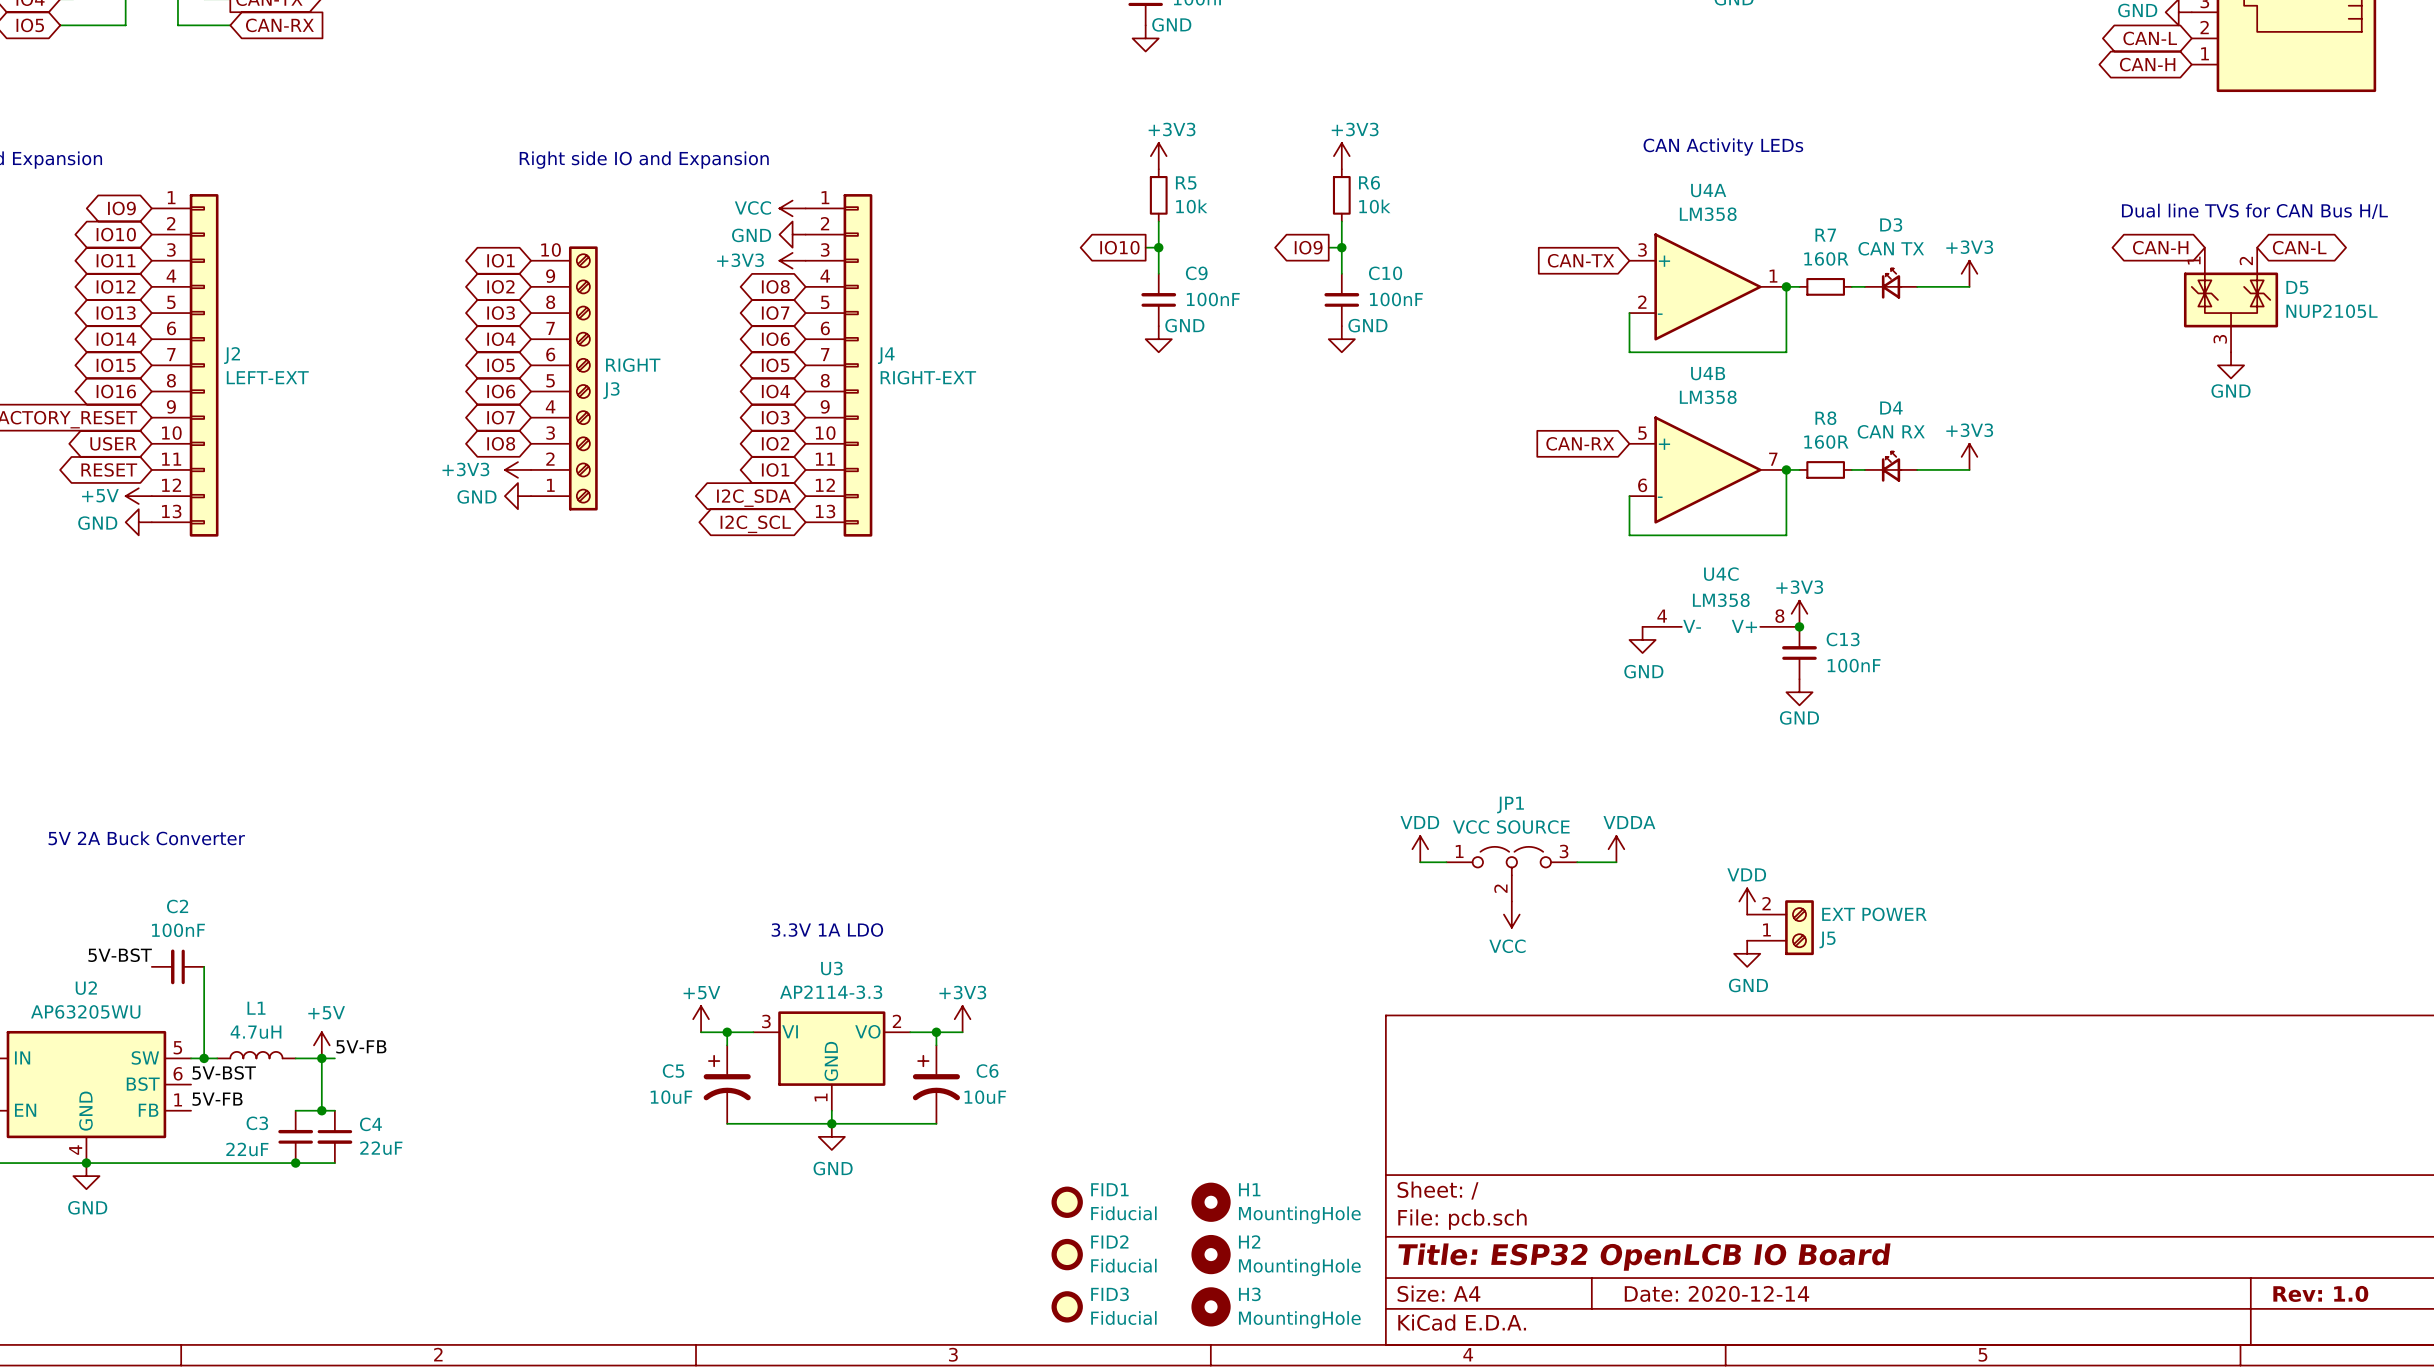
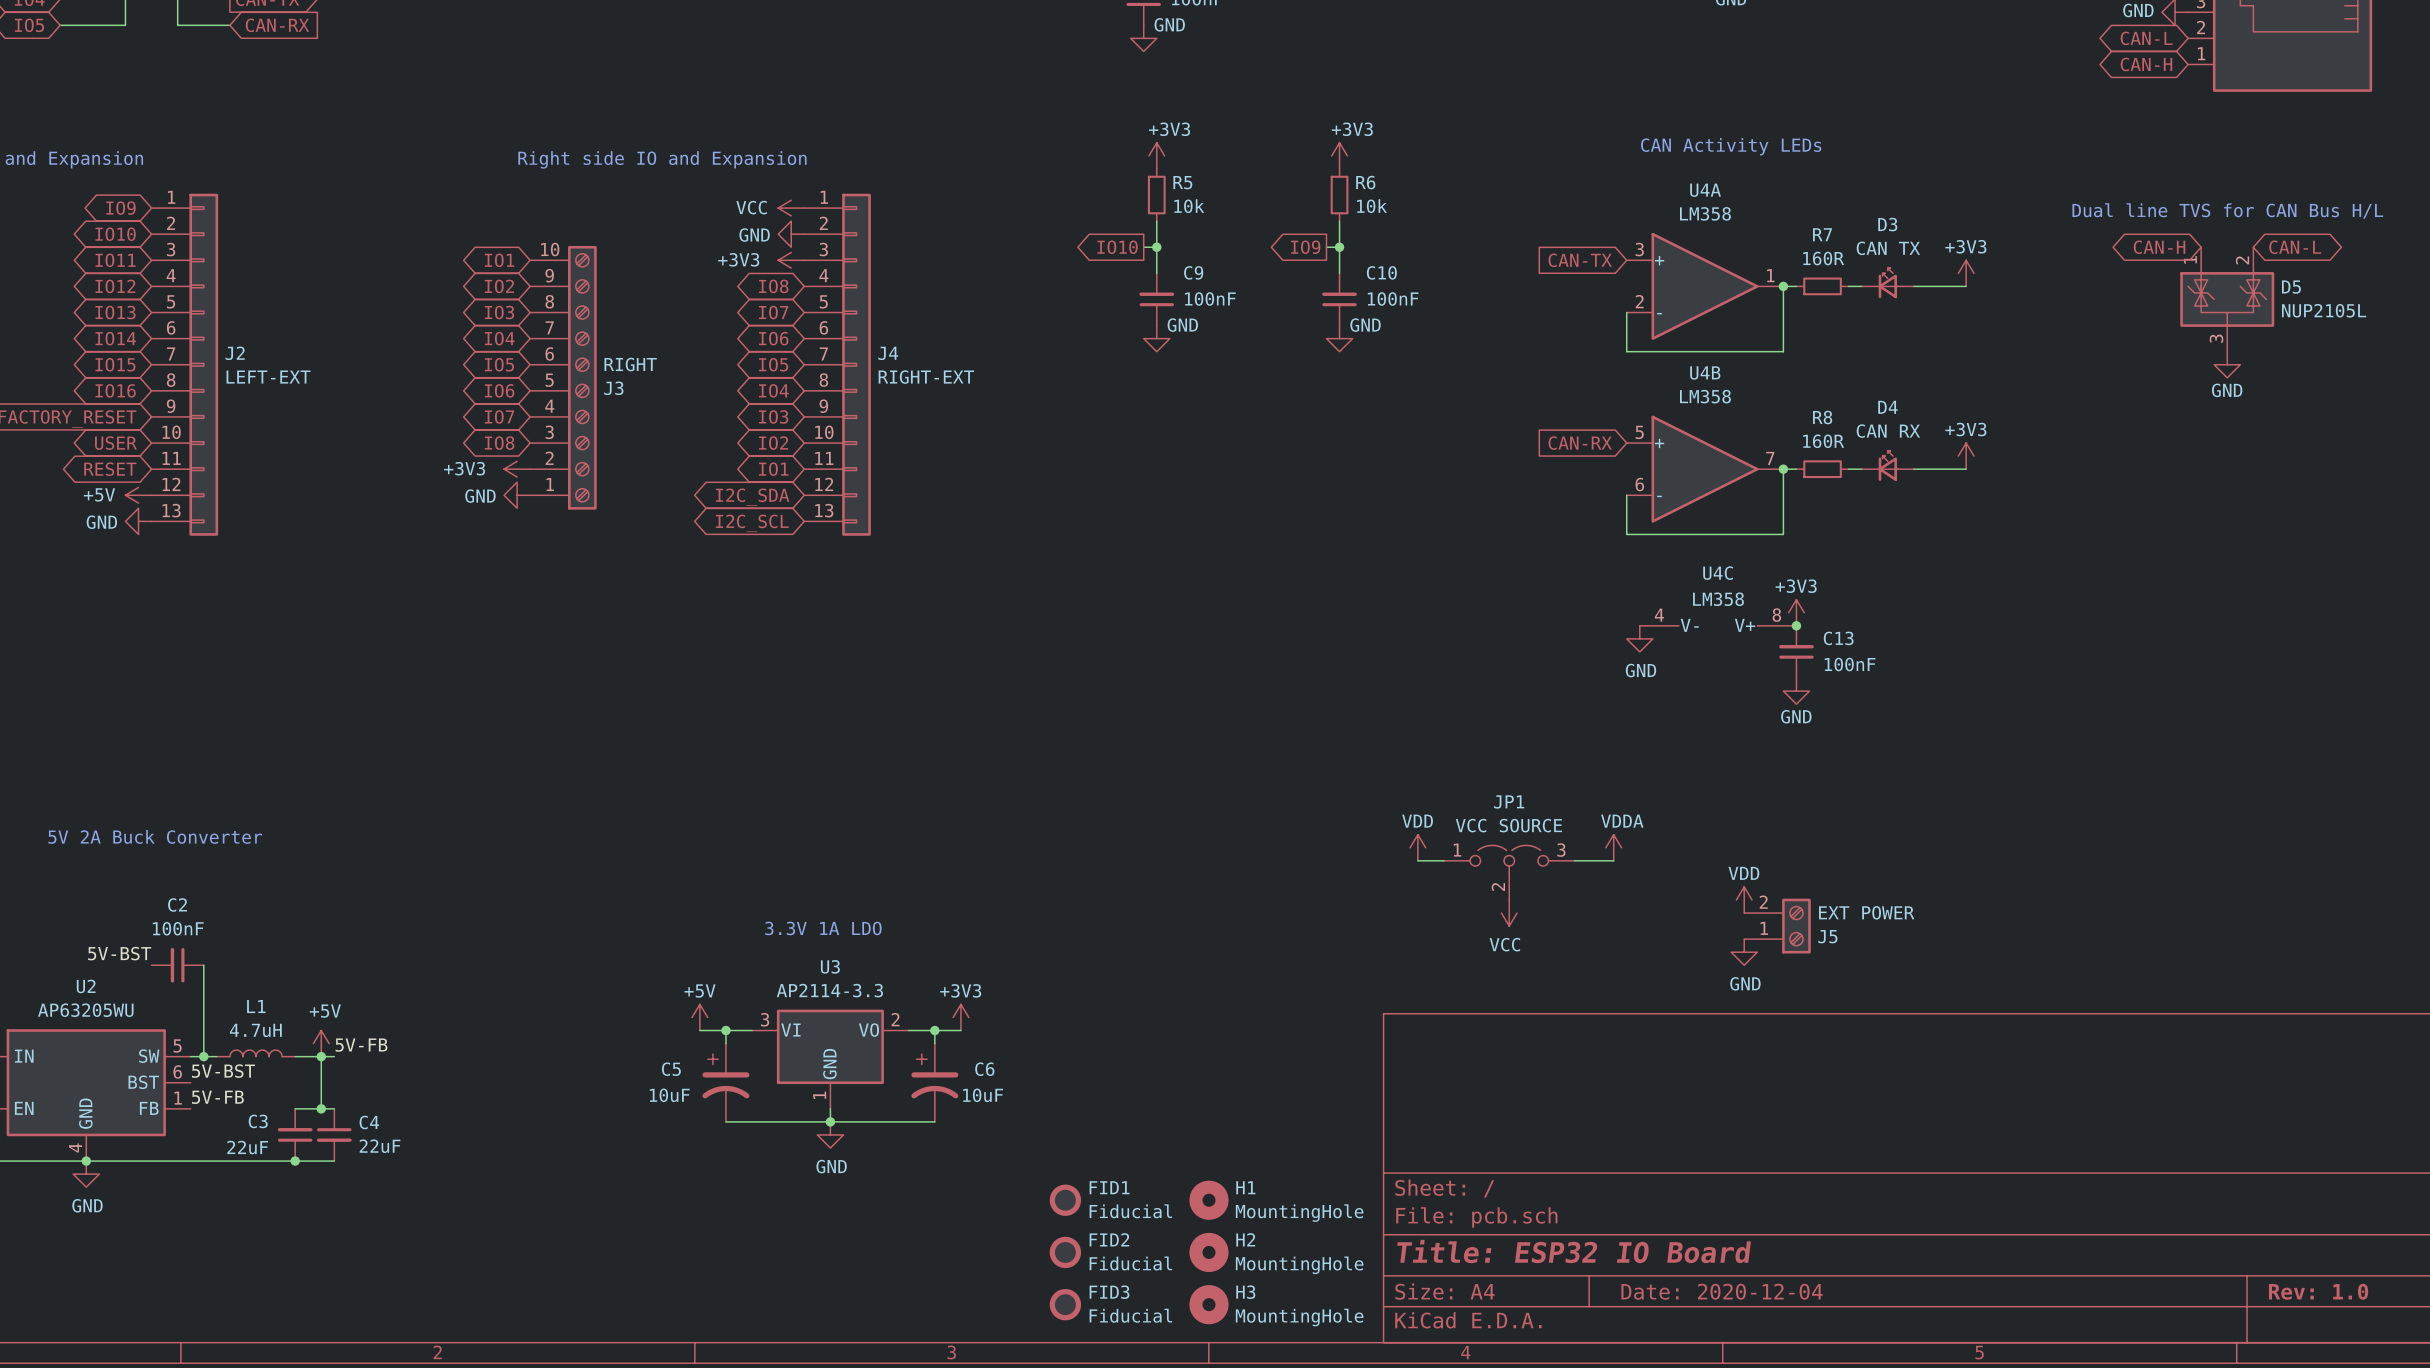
title block: Title: ESP32 OpenLCB IO Board (1644, 1257) -> Title: ESP32 IO Board (1574, 1251)
title block: Date: 2020-12-14 (1716, 1293) -> Date: 2020-12-04 (1722, 1291)

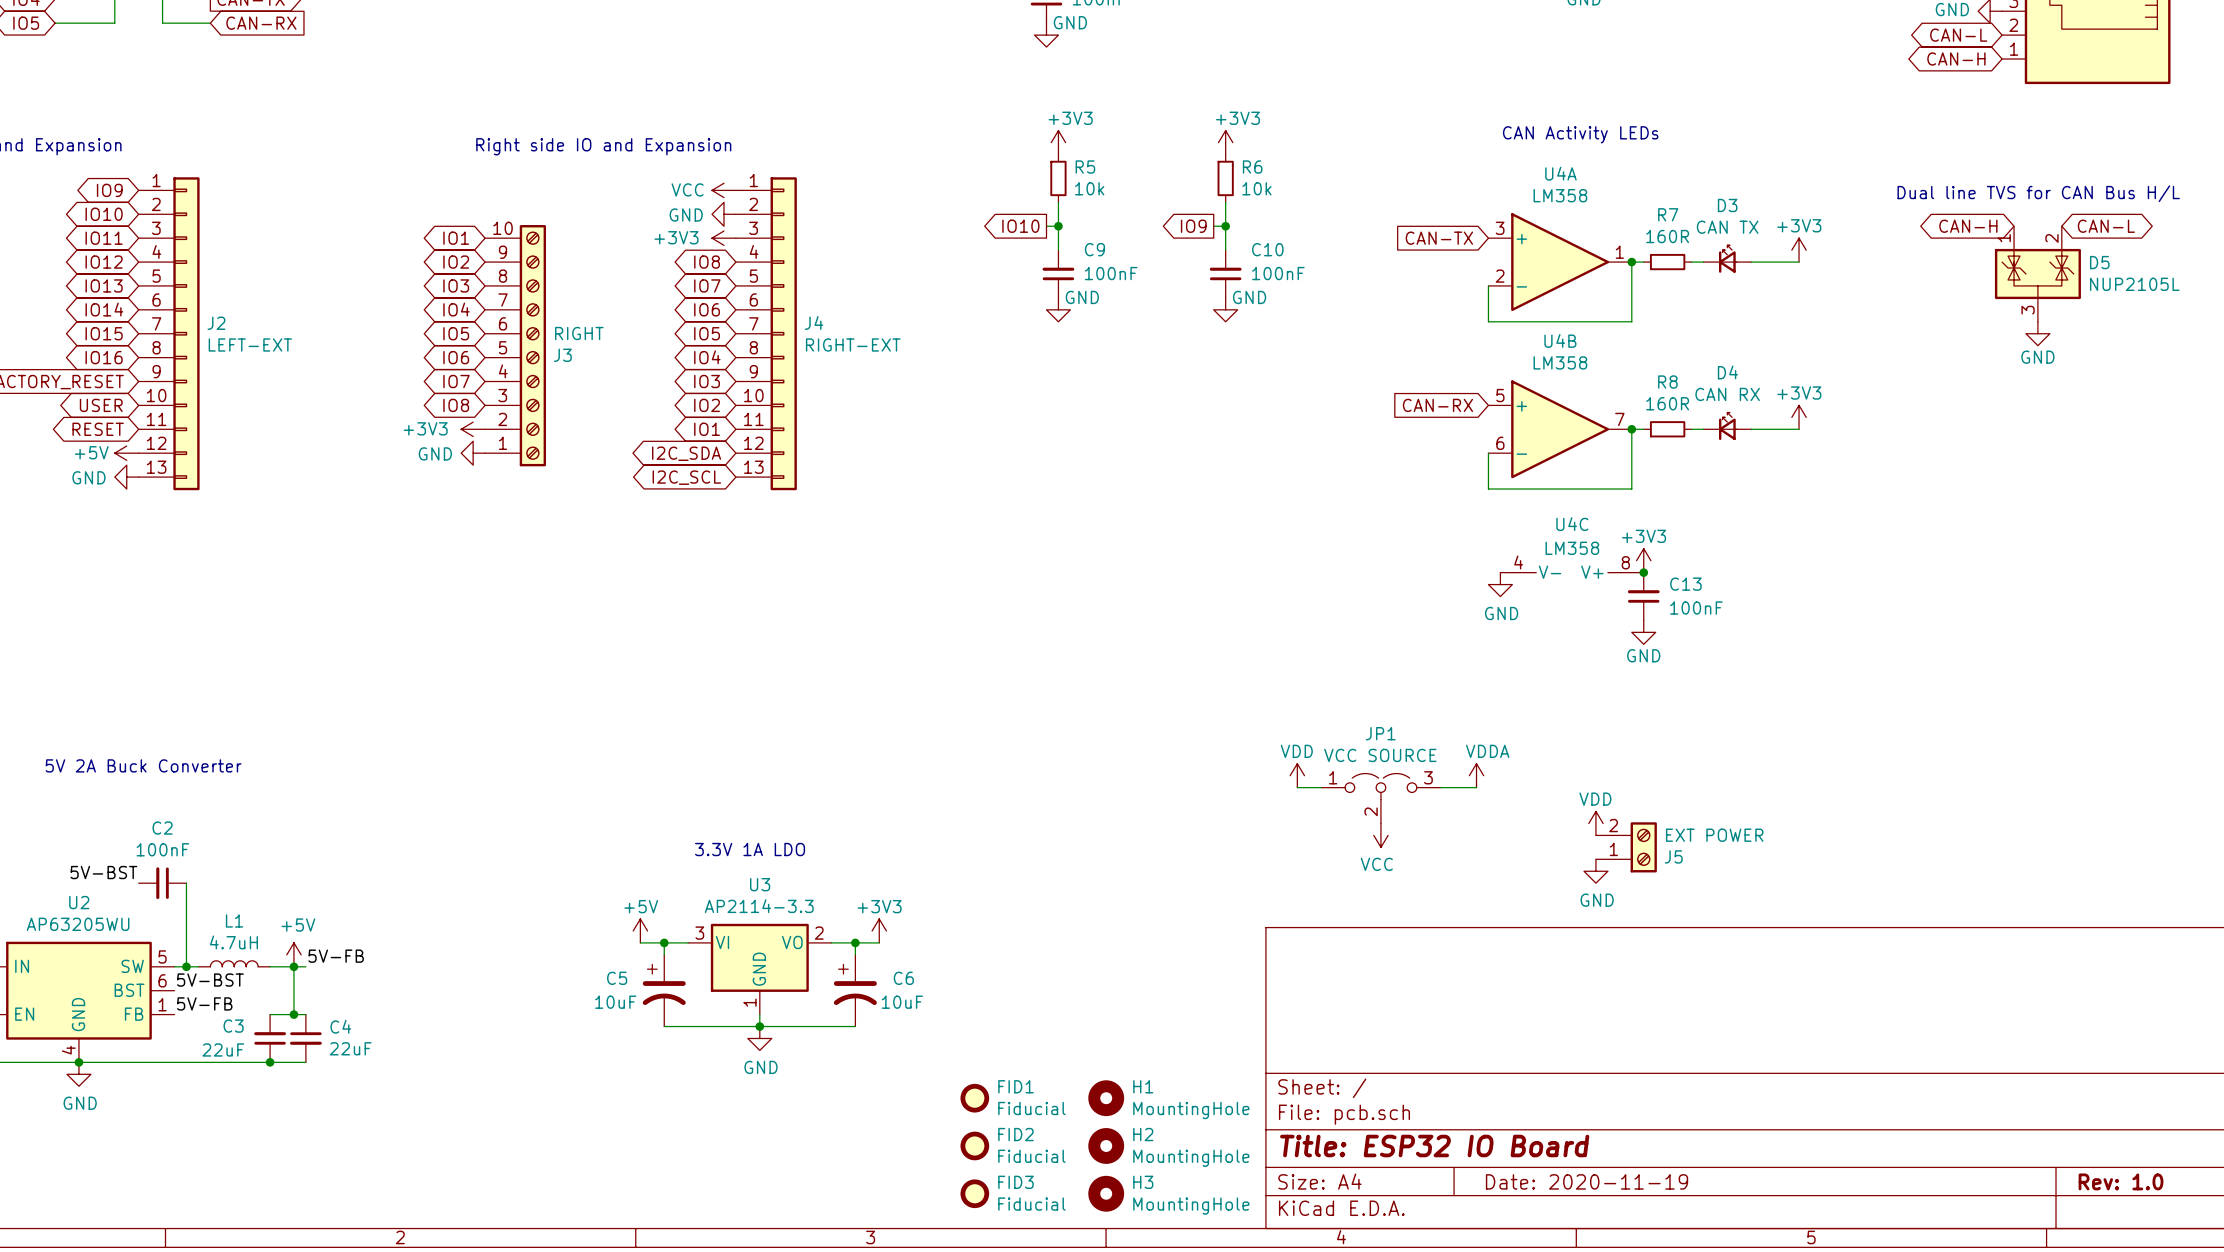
title block: Date: 2020-12-04 (1722, 1291) -> Date: 2020-11-19 (1587, 1181)

